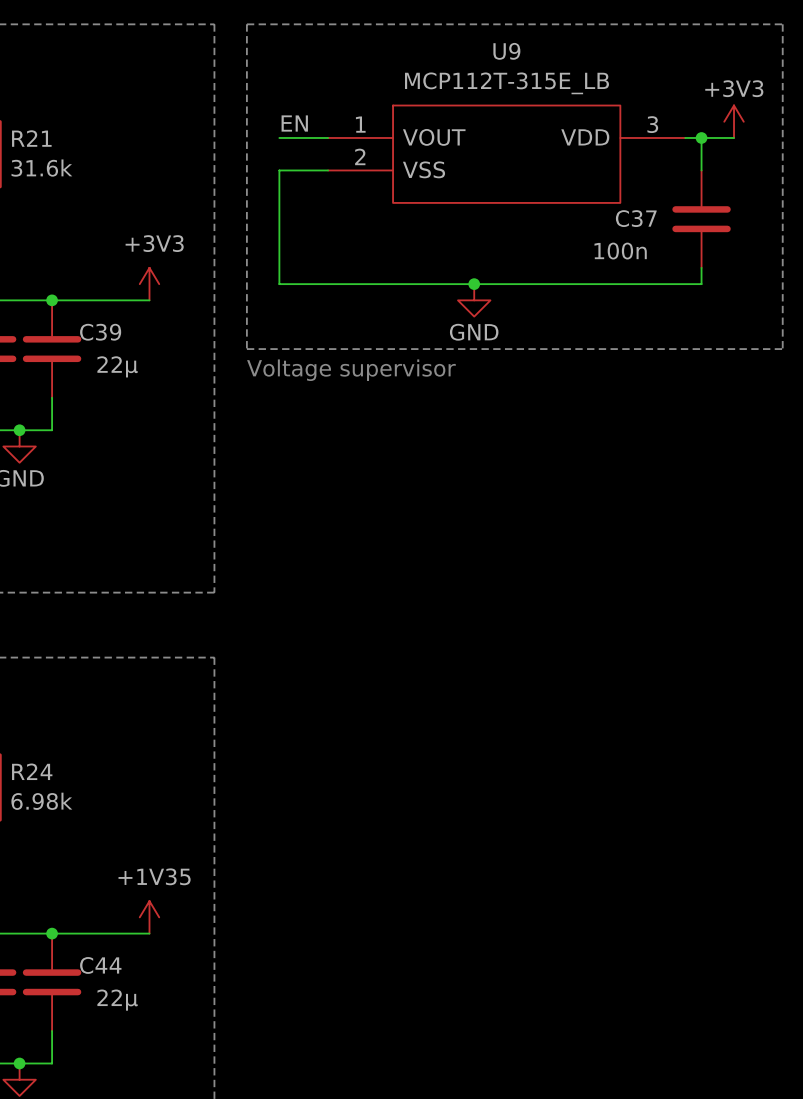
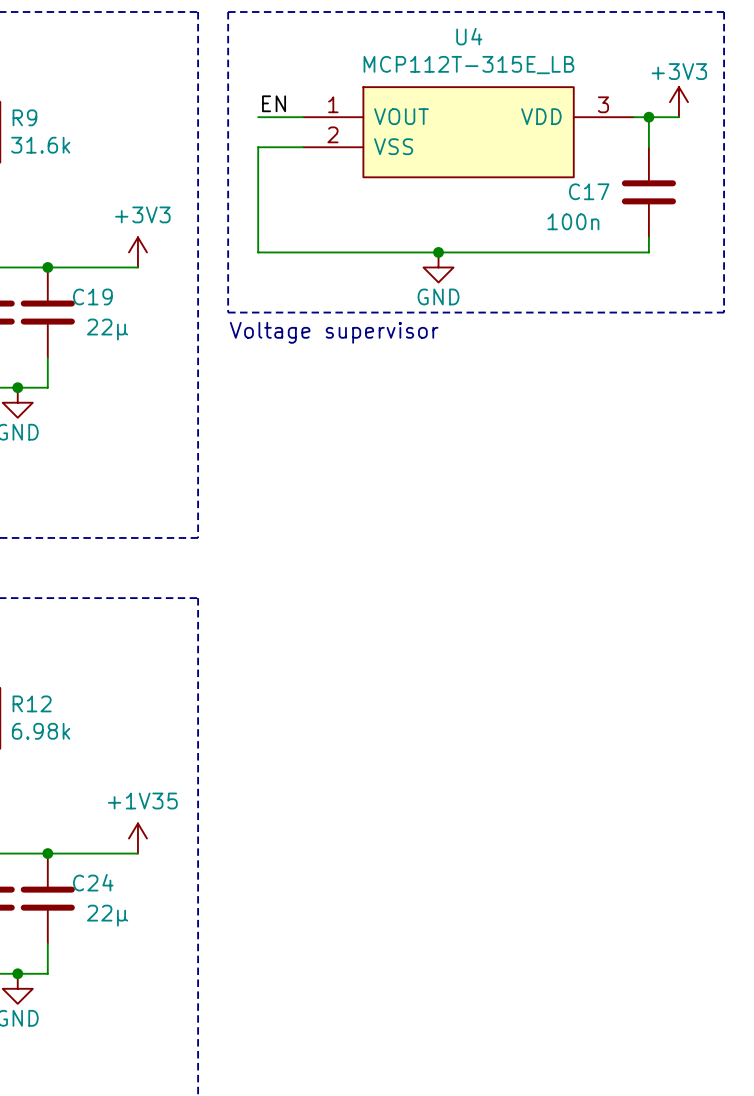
U9 name: U9 (506, 51) -> U4 (469, 36)
R21 name: R21 (31, 138) -> R9 (24, 117)
C37 name: C37 (636, 218) -> C17 (589, 191)
C39 name: C39 (100, 332) -> C19 (92, 296)
R24 name: R24 (32, 771) -> R12 (32, 703)
C44 name: C44 (100, 965) -> C24 (93, 882)

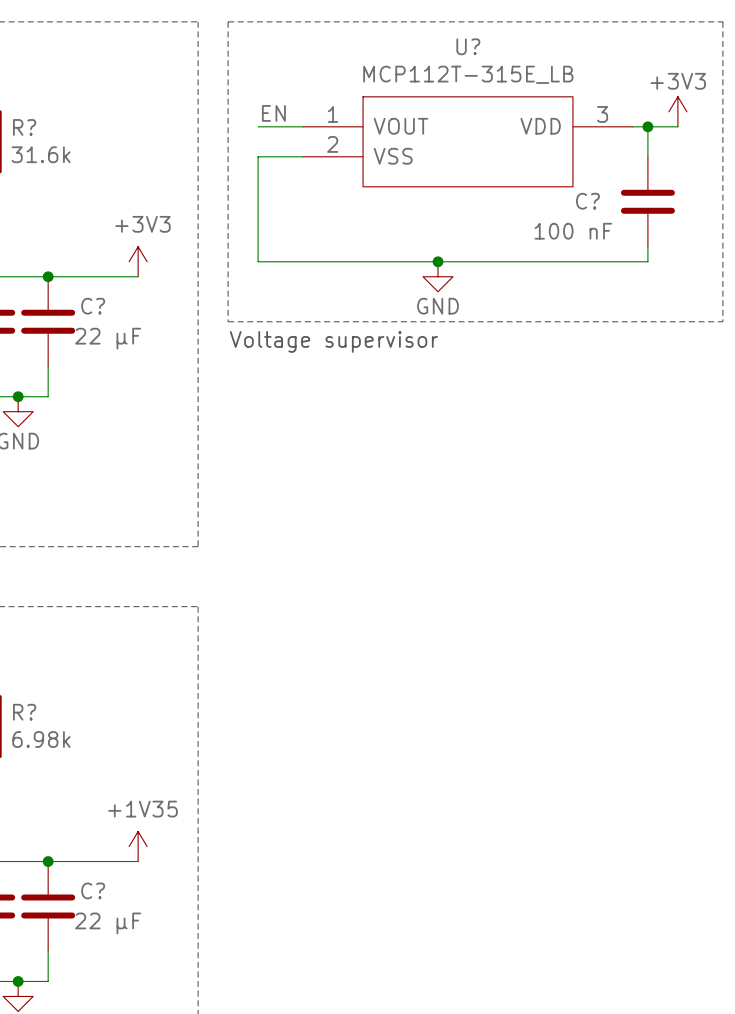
U4 name: U4 (469, 36) -> U? (468, 46)
R9 name: R9 (24, 117) -> R? (24, 127)
C17 name: C17 (589, 191) -> C? (587, 201)
C17 value: 100n (573, 221) -> 100 nF (573, 231)
C19 name: C19 (92, 296) -> C? (93, 306)
C19 value: 22µ (107, 329) -> 22 µF (108, 338)
R12 name: R12 (32, 703) -> R? (24, 712)
C24 name: C24 (93, 882) -> C? (93, 890)
C24 value: 22µ (107, 915) -> 22 µF (108, 923)

